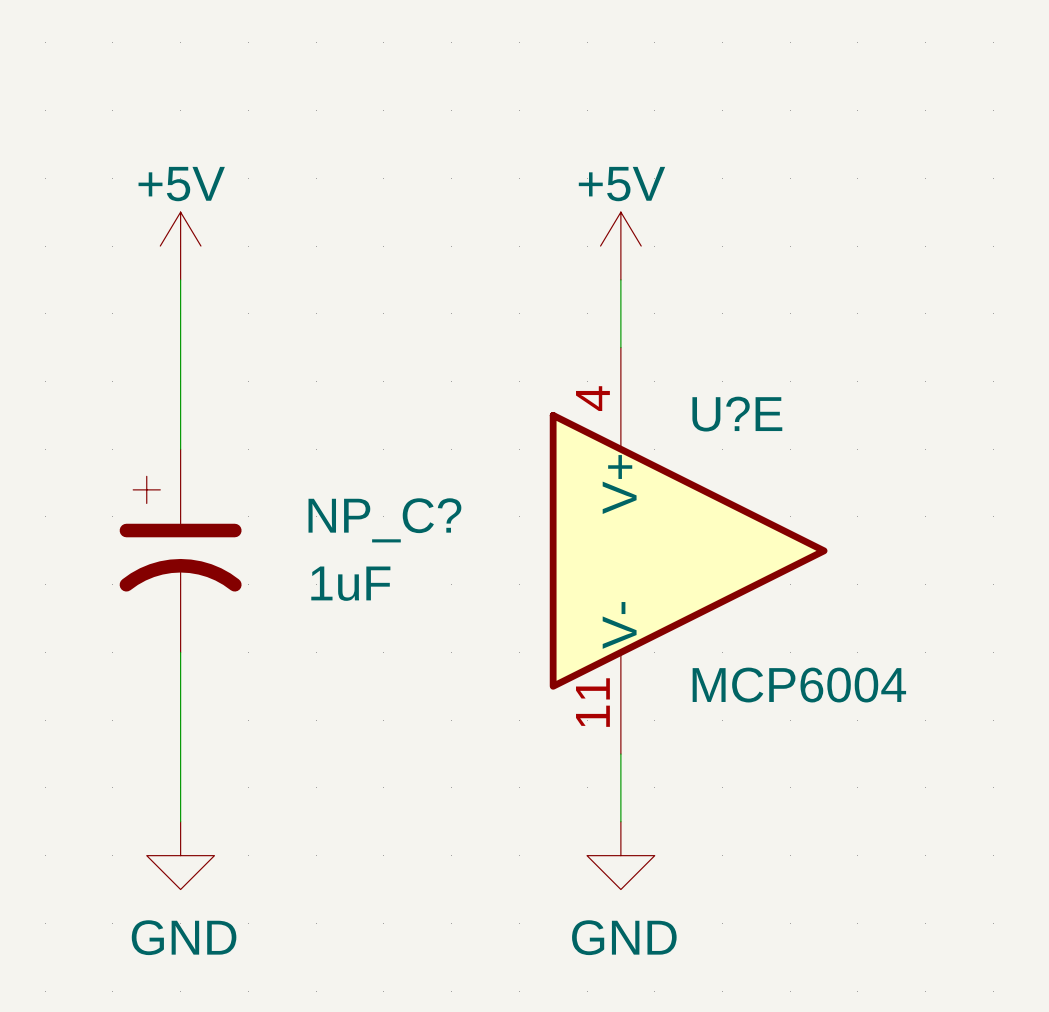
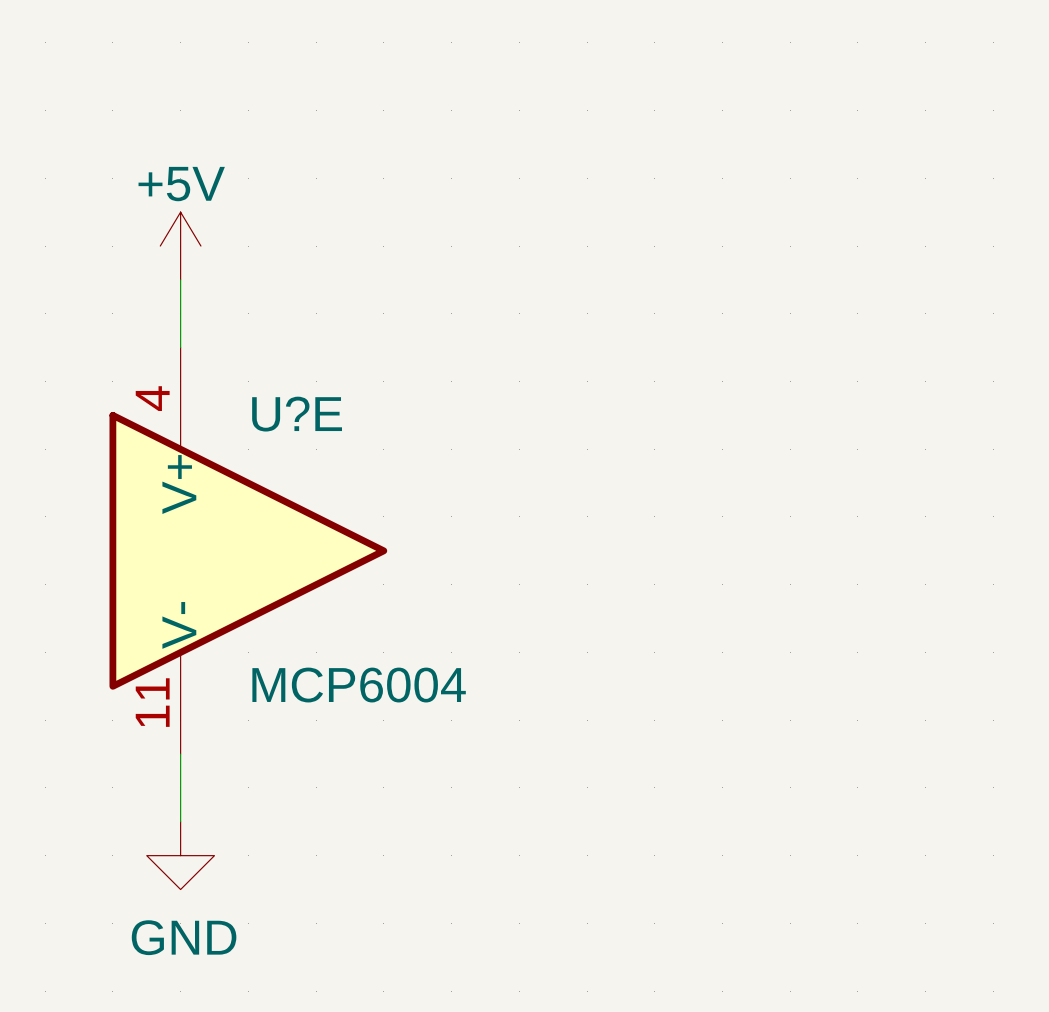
power symbol: +5V (620, 246) -> none
wire: (620, 279) (620, 347) -> none
NP_C?: 1uF (180, 550) -> none
U?E position: (688, 550) -> (248, 550)
wire: (620, 754) (620, 821) -> none
power symbol: GND (620, 855) -> none

